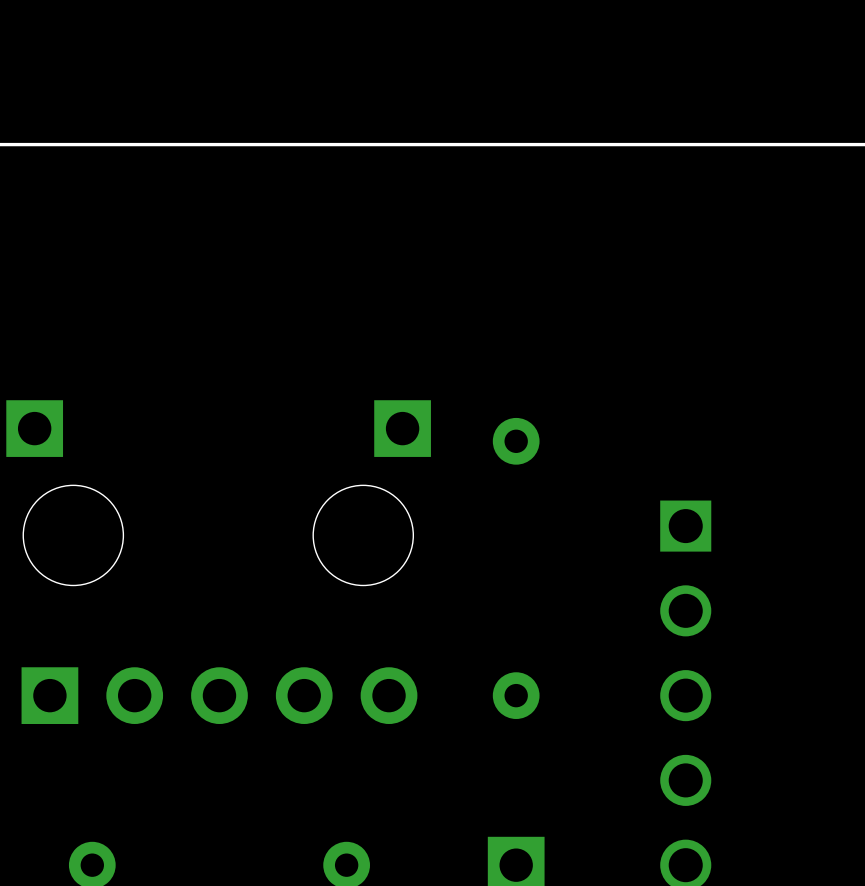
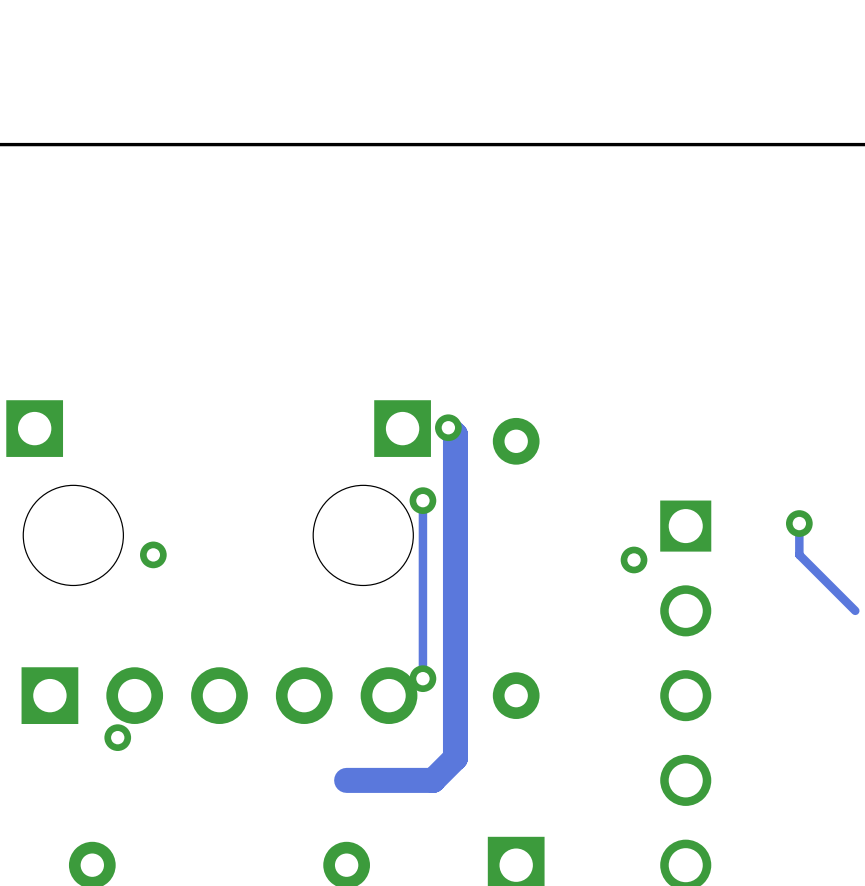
track: none -> (448, 427) (455, 434) (455, 758) (433, 780) (346, 780)
via: none -> (448, 427)
track: none -> (422, 500) (422, 678)
via: none -> (422, 500)
track: none -> (799, 523) (799, 554) (855, 610)
via: none -> (799, 523)
via: none -> (153, 554)
via: none -> (634, 559)
via: none -> (422, 678)
via: none -> (117, 737)

